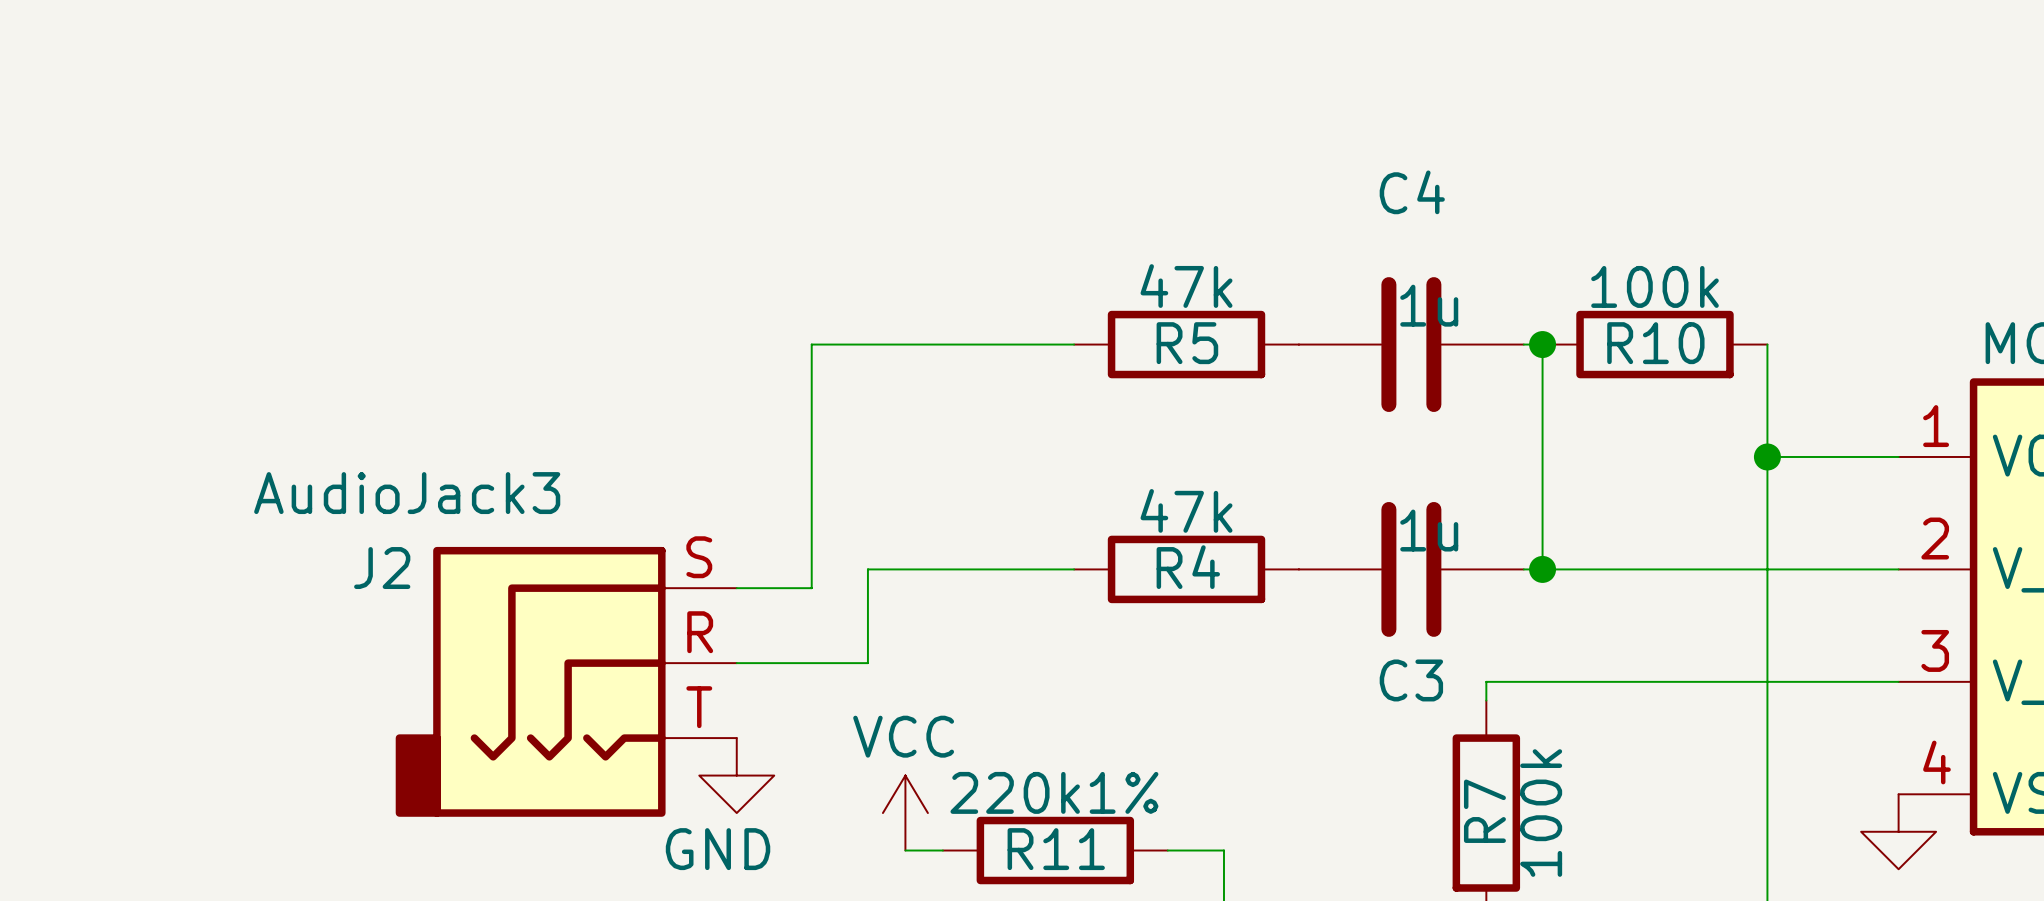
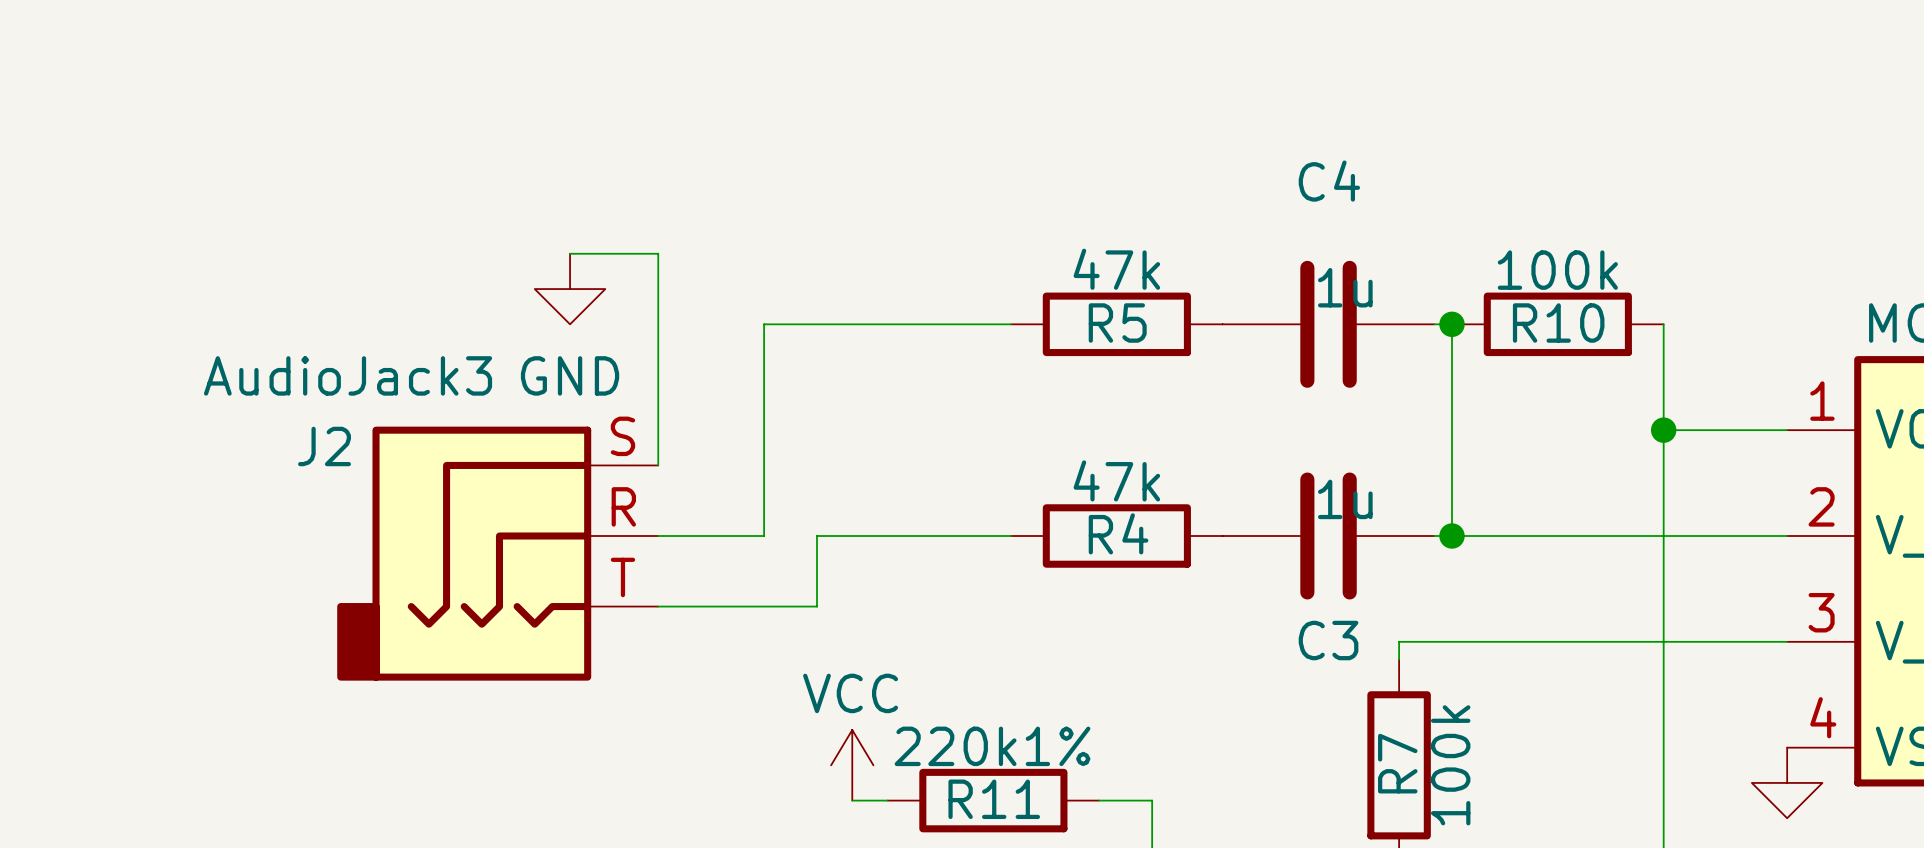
wire: none -> (570, 253) (658, 253) (658, 465)
wire: (811, 569) (811, 588) (736, 588) -> (764, 536) (658, 536)
wire: (867, 644) (867, 663) (736, 663) -> (816, 606) (658, 606)
J2 position: (566, 681) -> (497, 553)
power symbol position: GND (736, 775) -> GND (570, 289)
power symbol text position: GND (718, 849) -> GND (570, 375)

